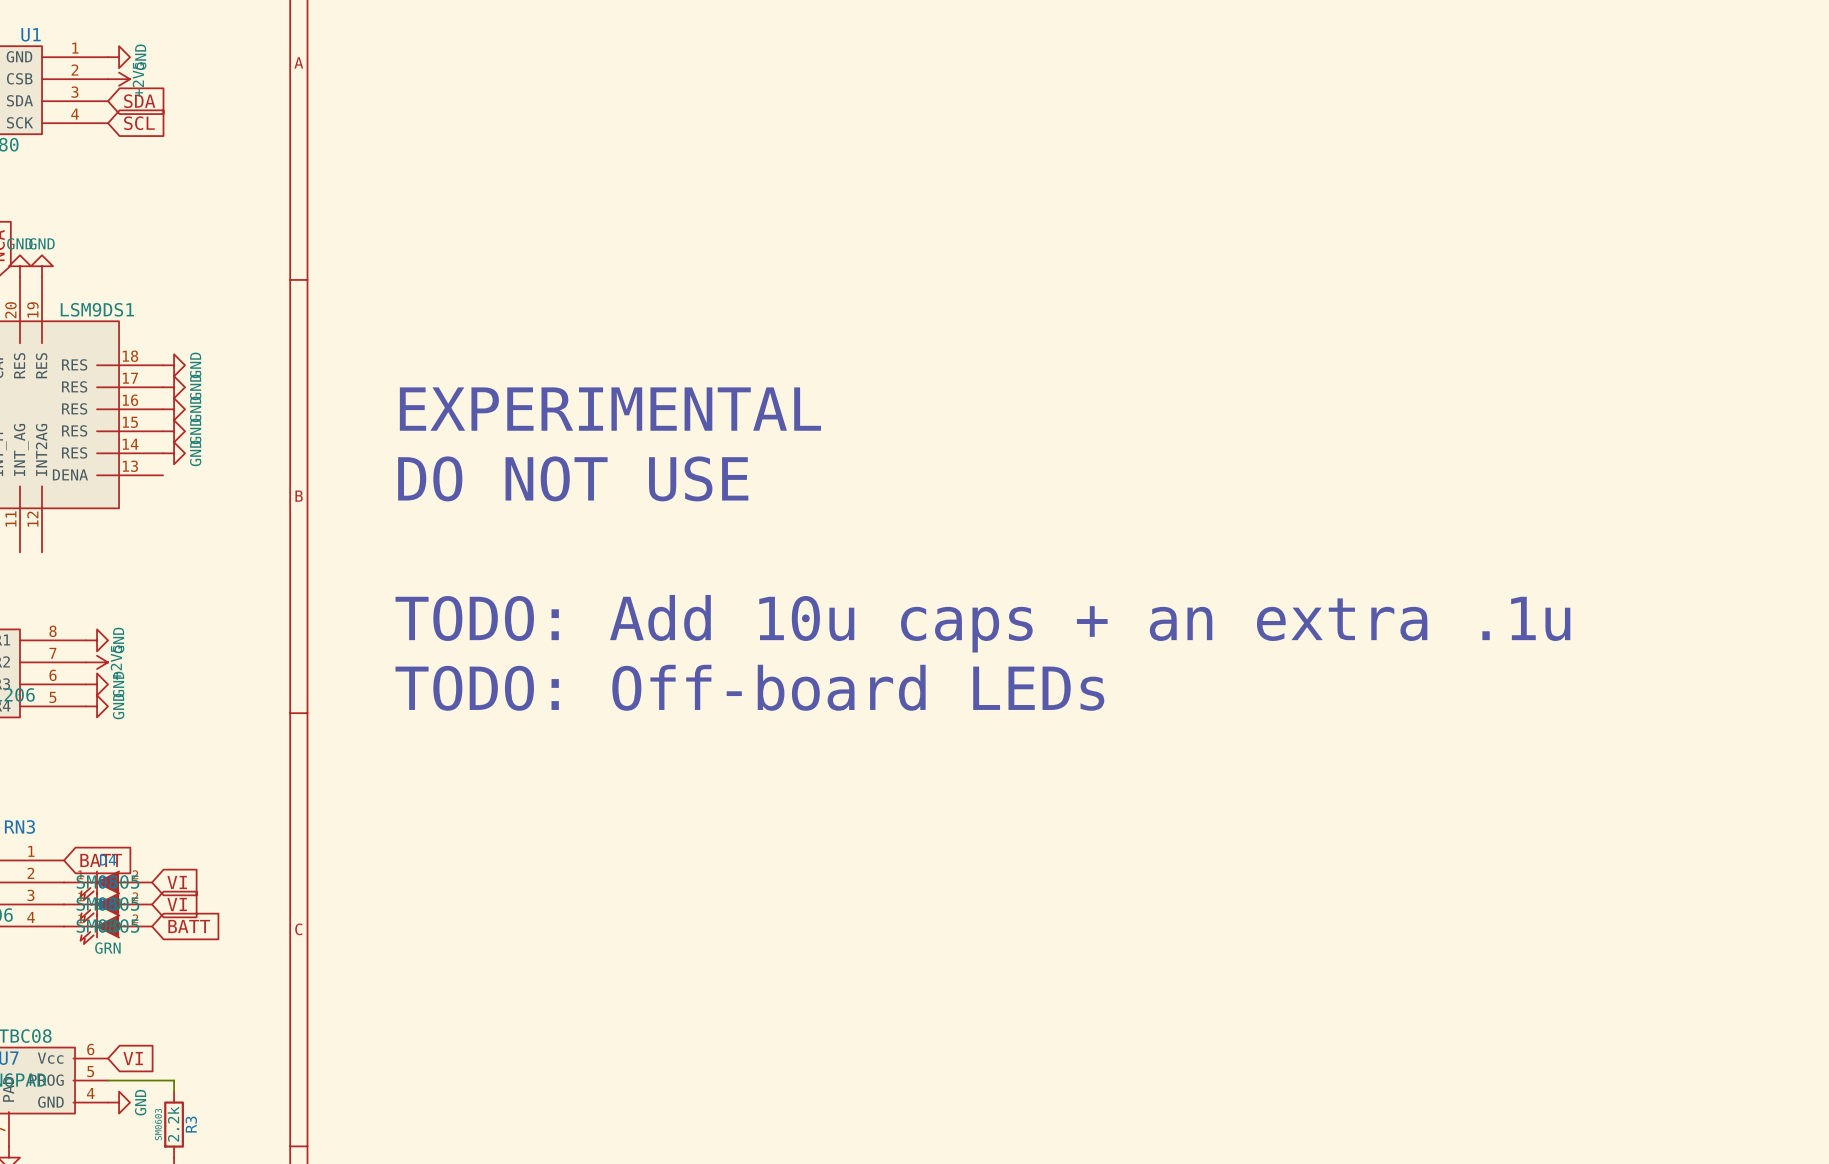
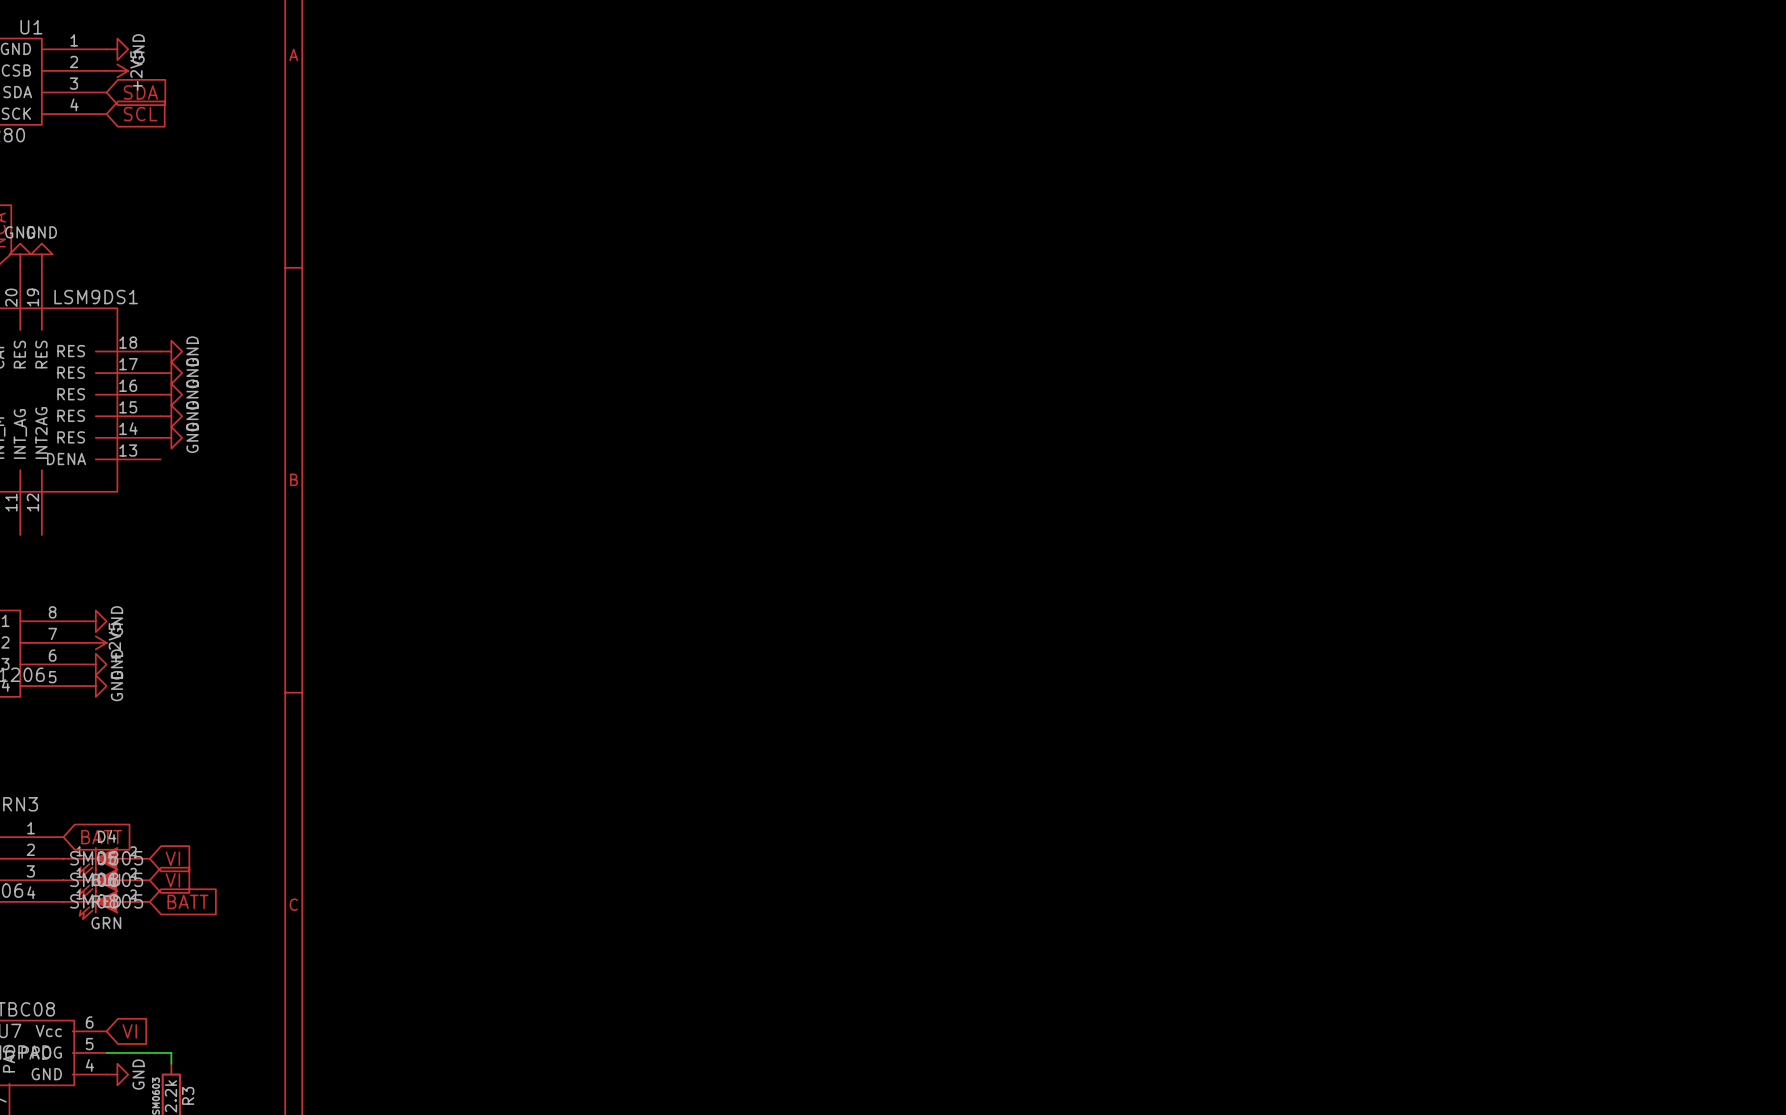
text: EXPERIMENTAL (610, 409) -> none
text: DO NOT USE (573, 478) -> none
text: TODO: Add 10u caps + an extra .1u (982, 623) -> none
text: TODO: Off-board LEDs (749, 687) -> none

